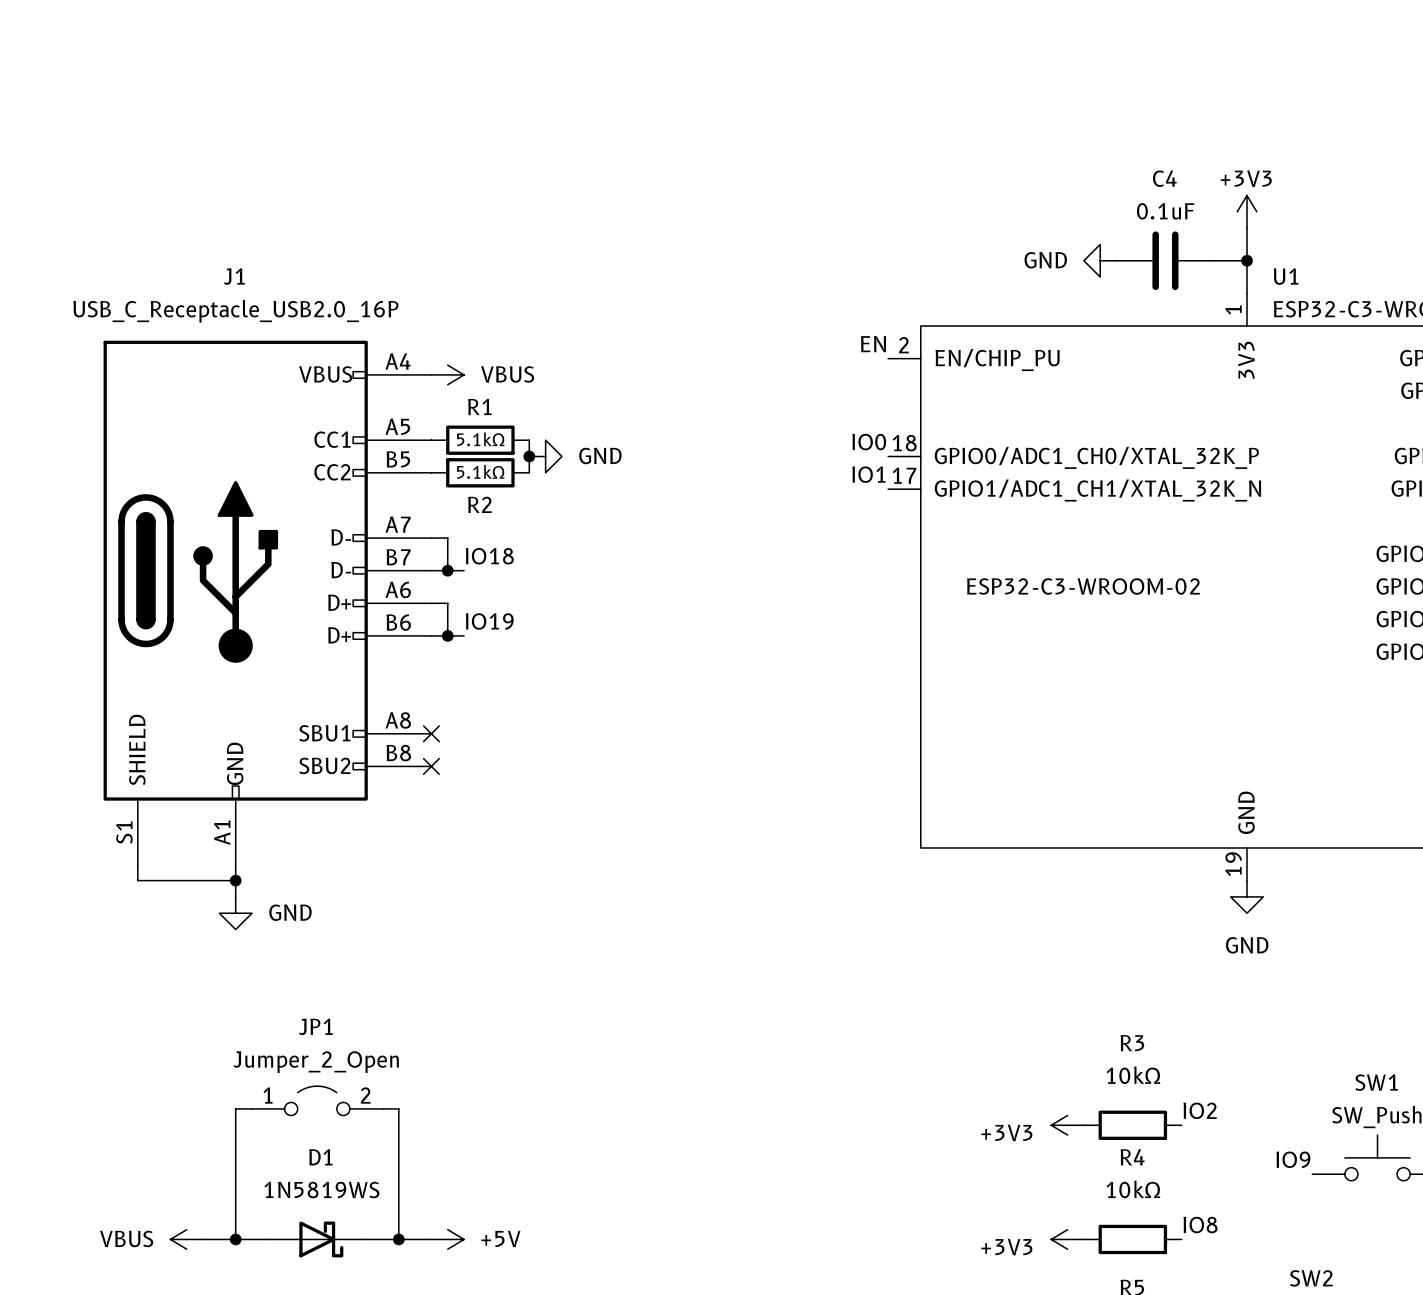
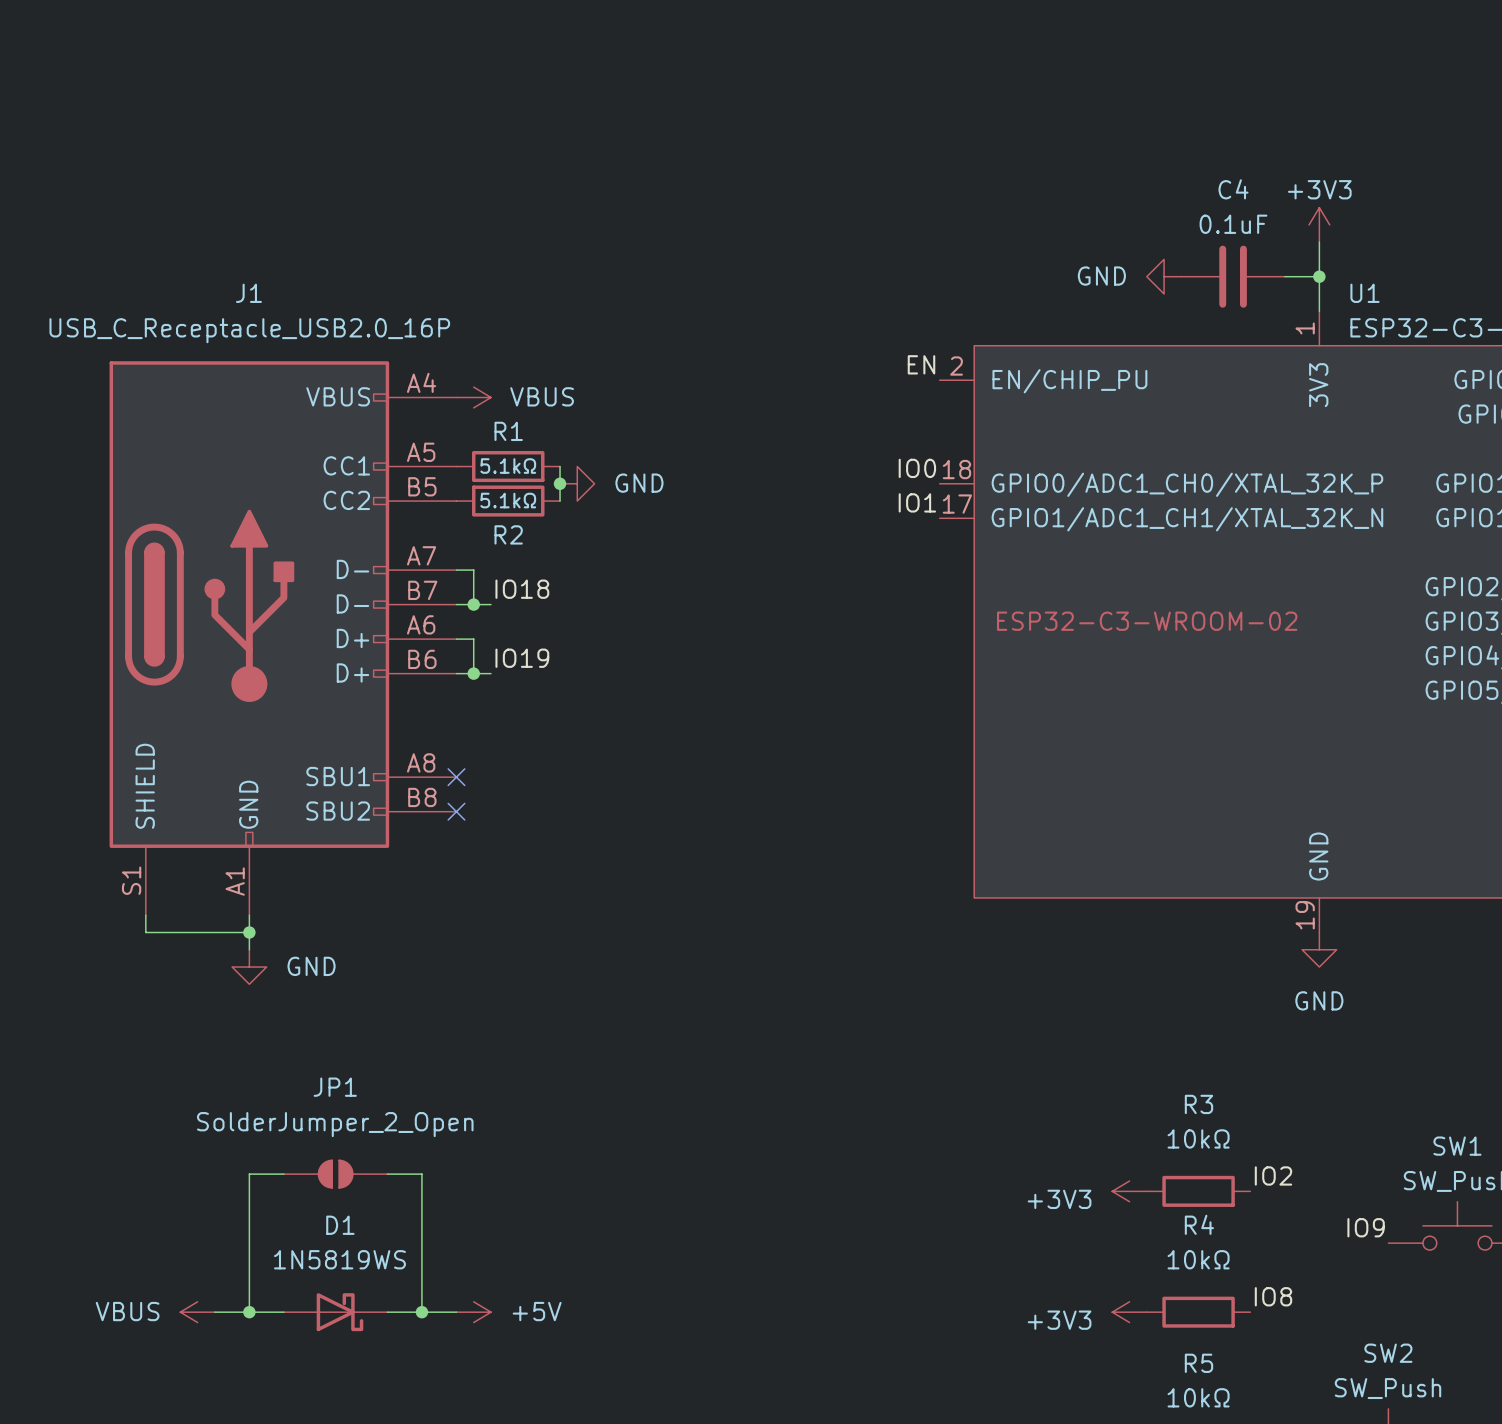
JP1 value: Jumper_2_Open (316, 1062) -> SolderJumper_2_Open (335, 1124)
JP1 symbol: [252, 1086, 383, 1116] -> [283, 1160, 388, 1188]

